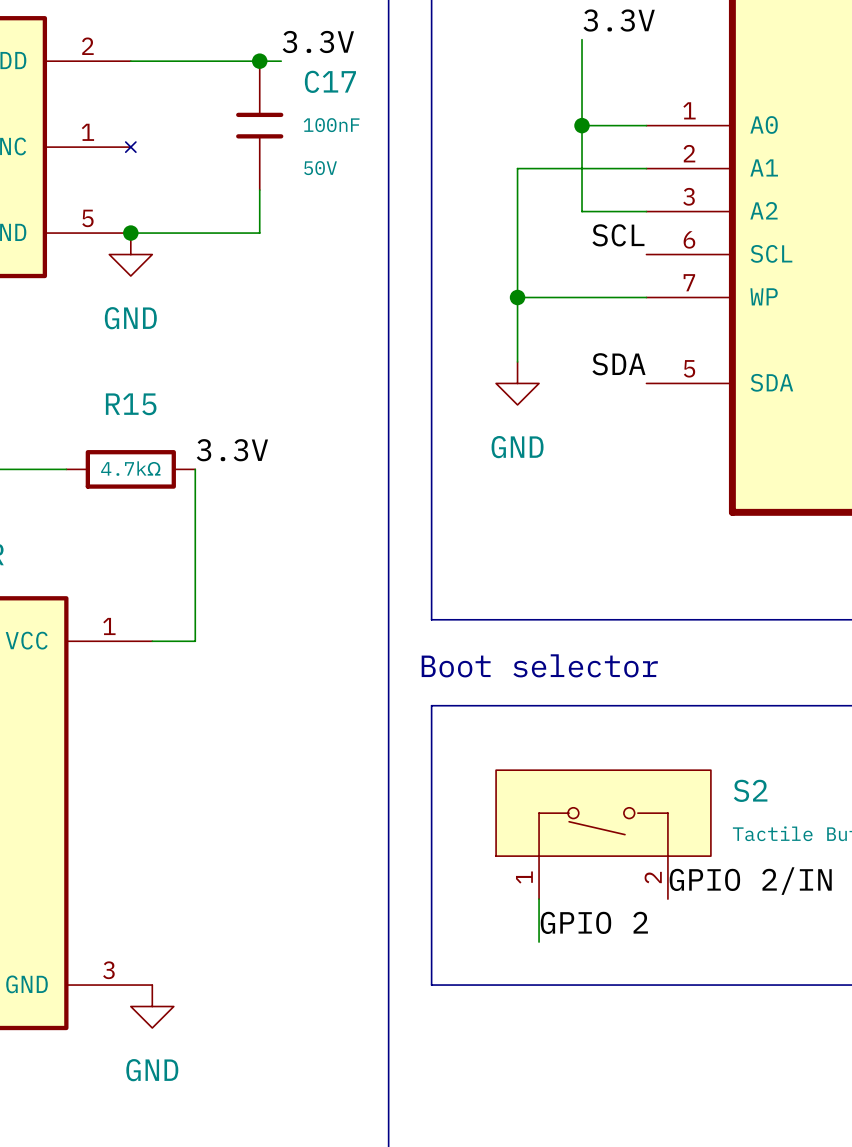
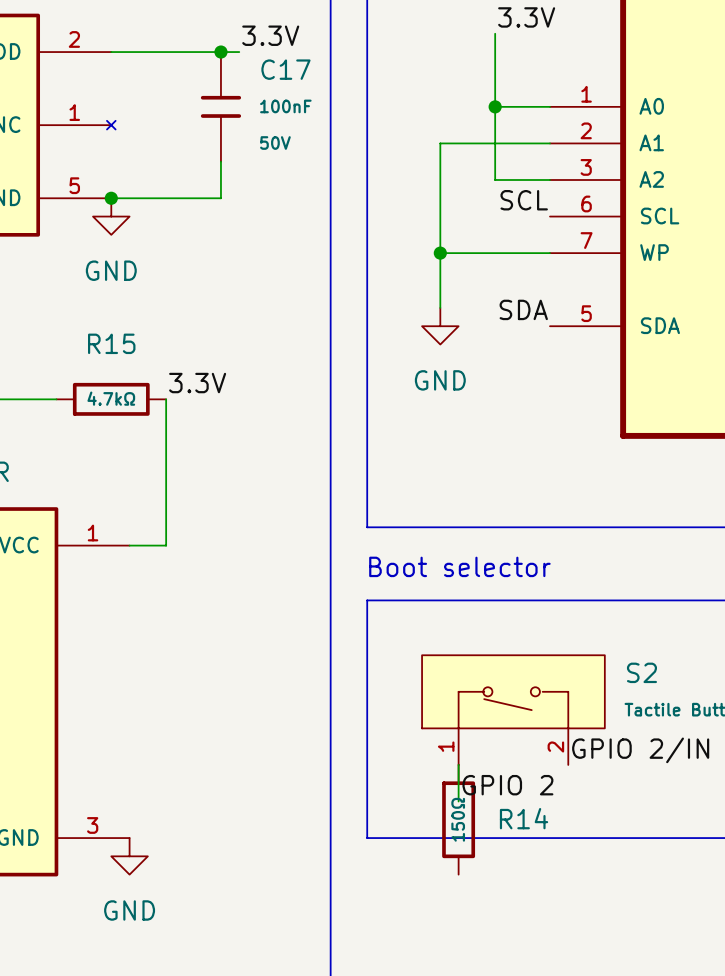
R14: none -> 150Ω (458, 819)

